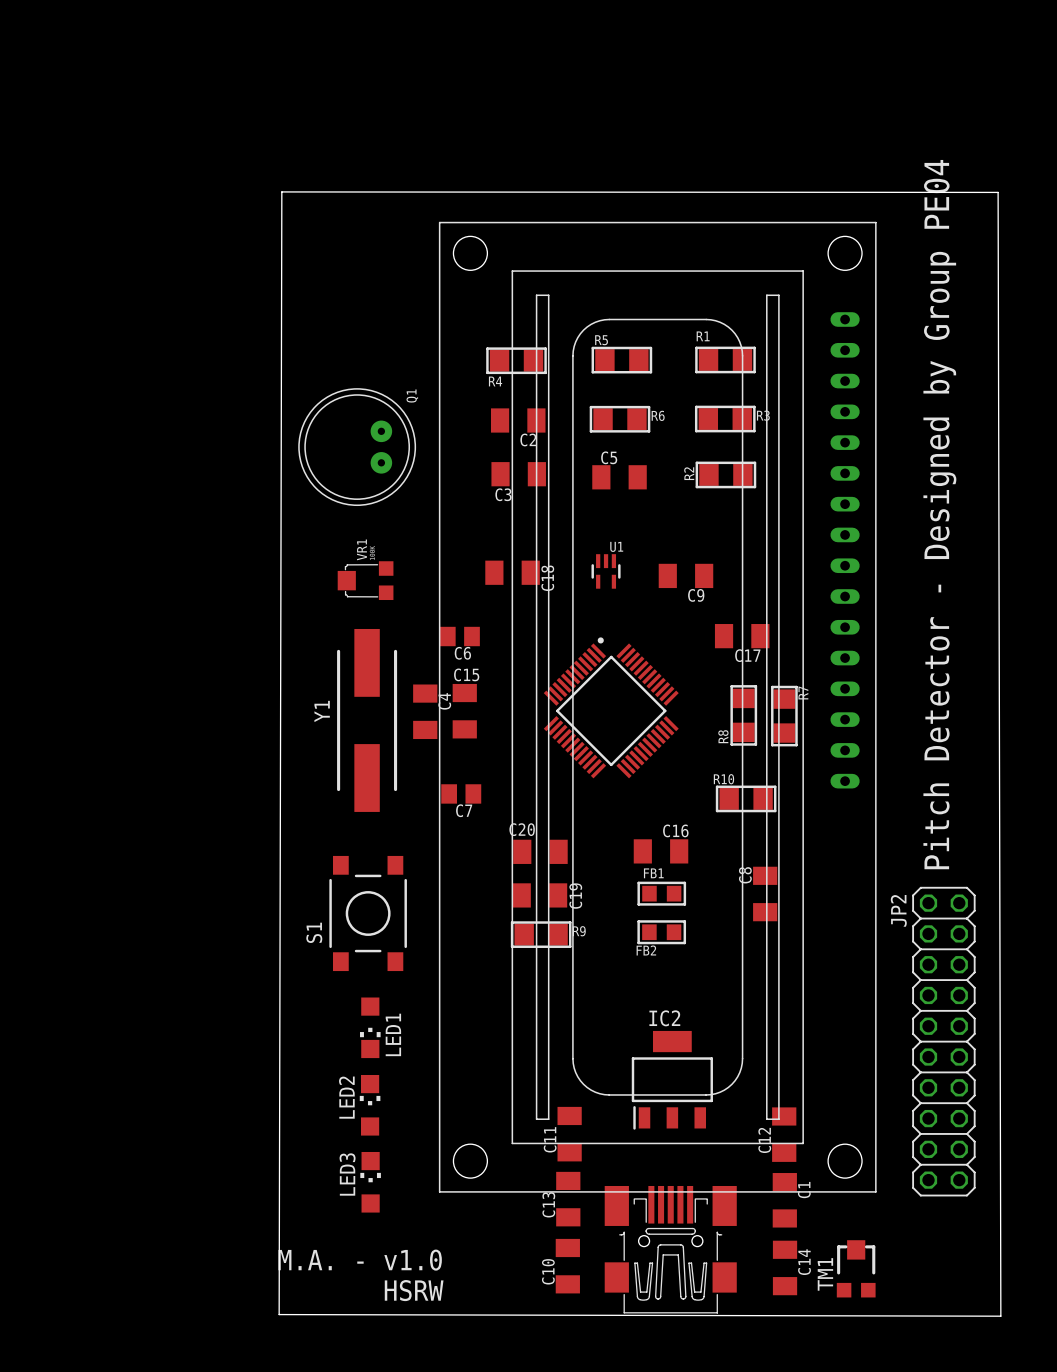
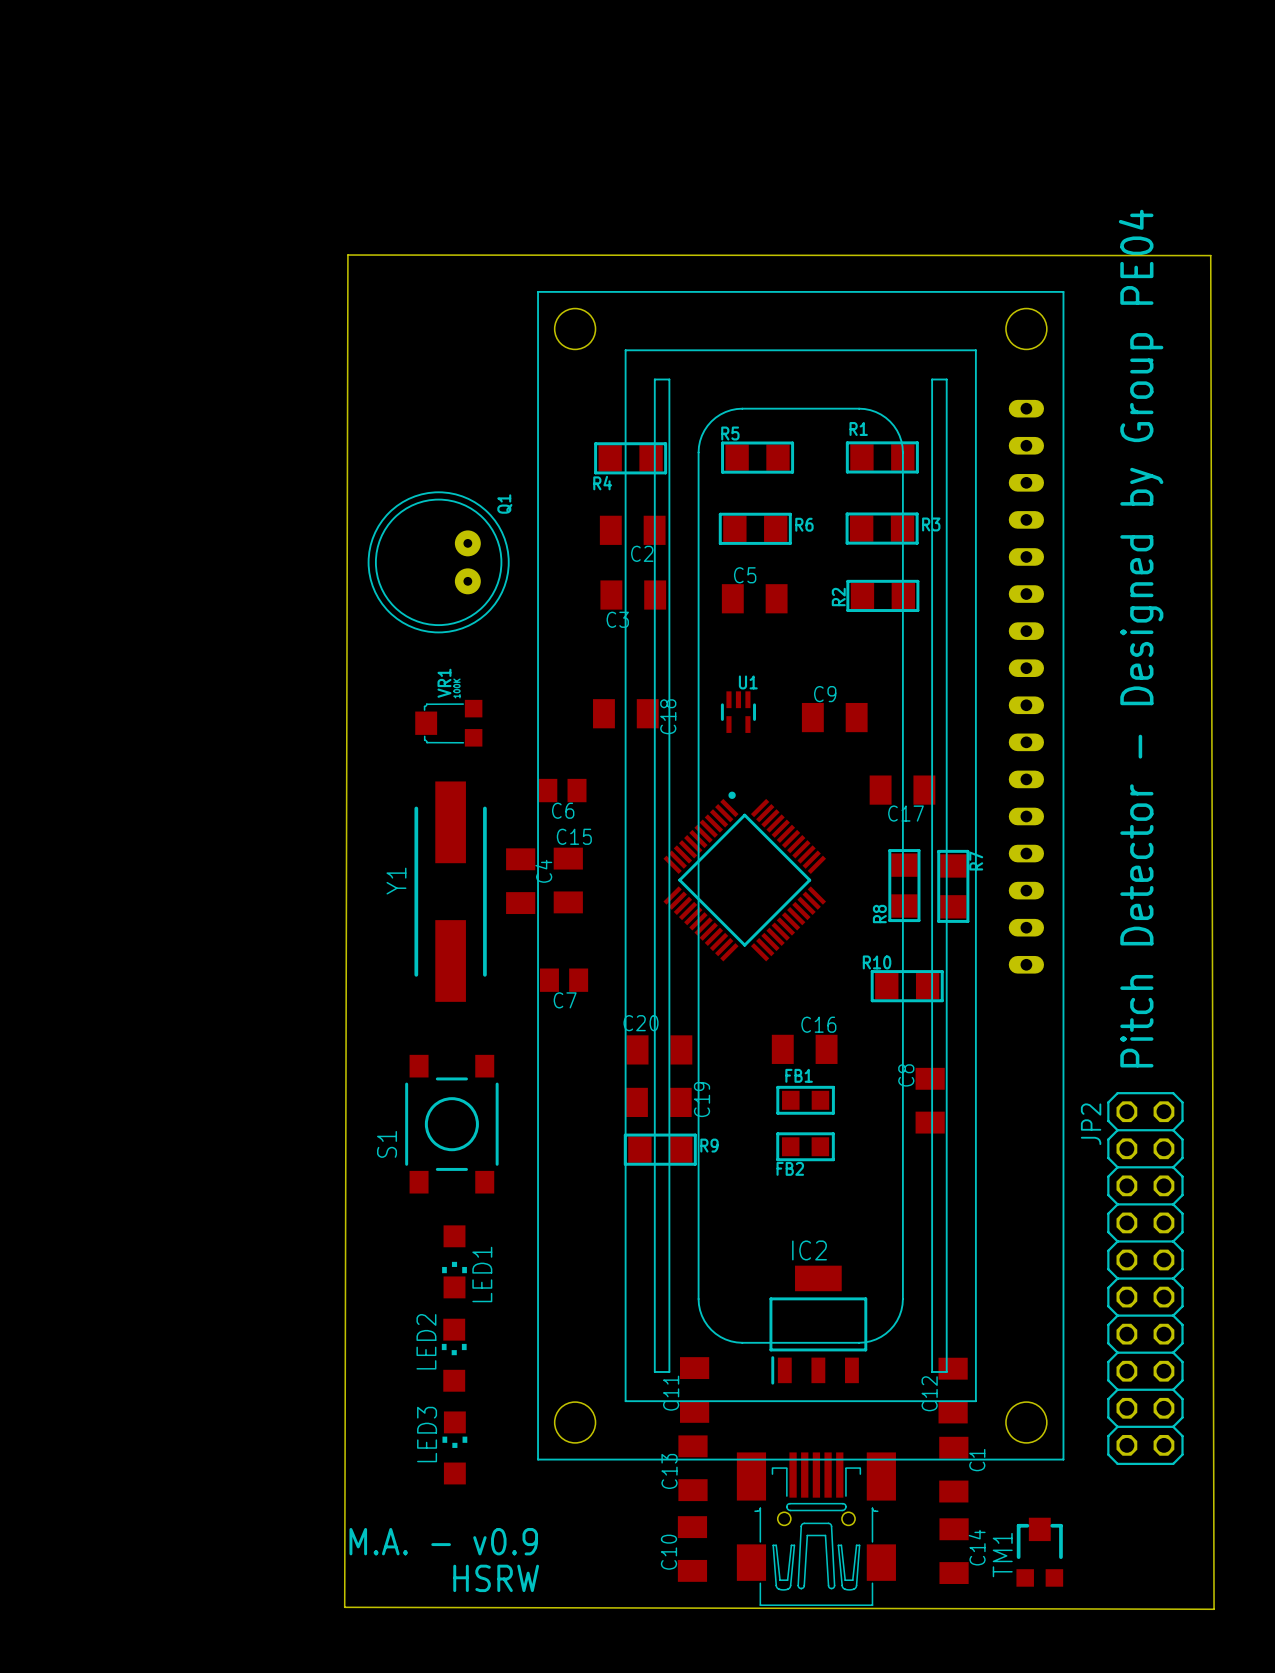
C9 name position: C9 (696, 595) -> C9 (825, 694)
text: M.A. - v1.0 (360, 1260) -> M.A. - v0.9 (443, 1541)

